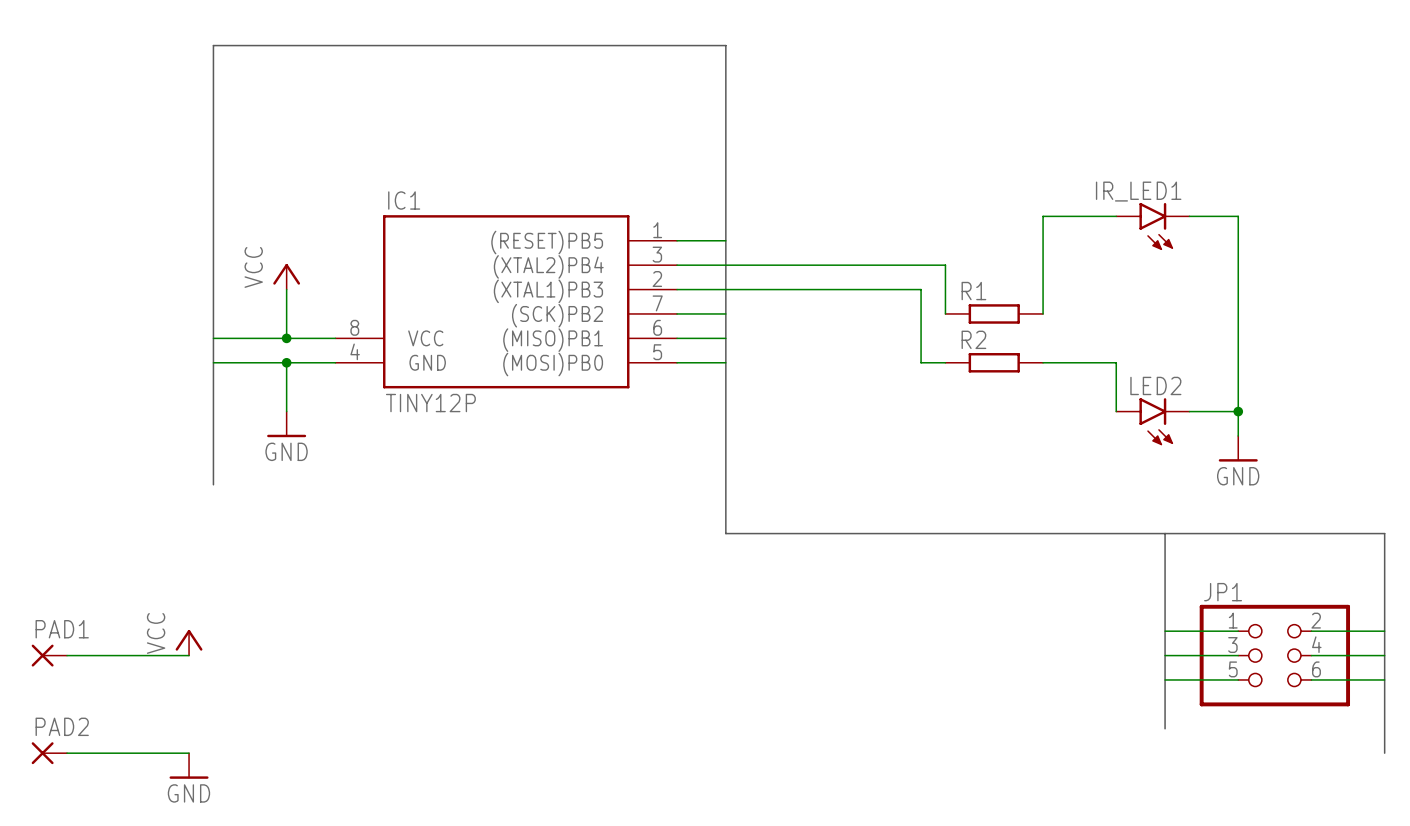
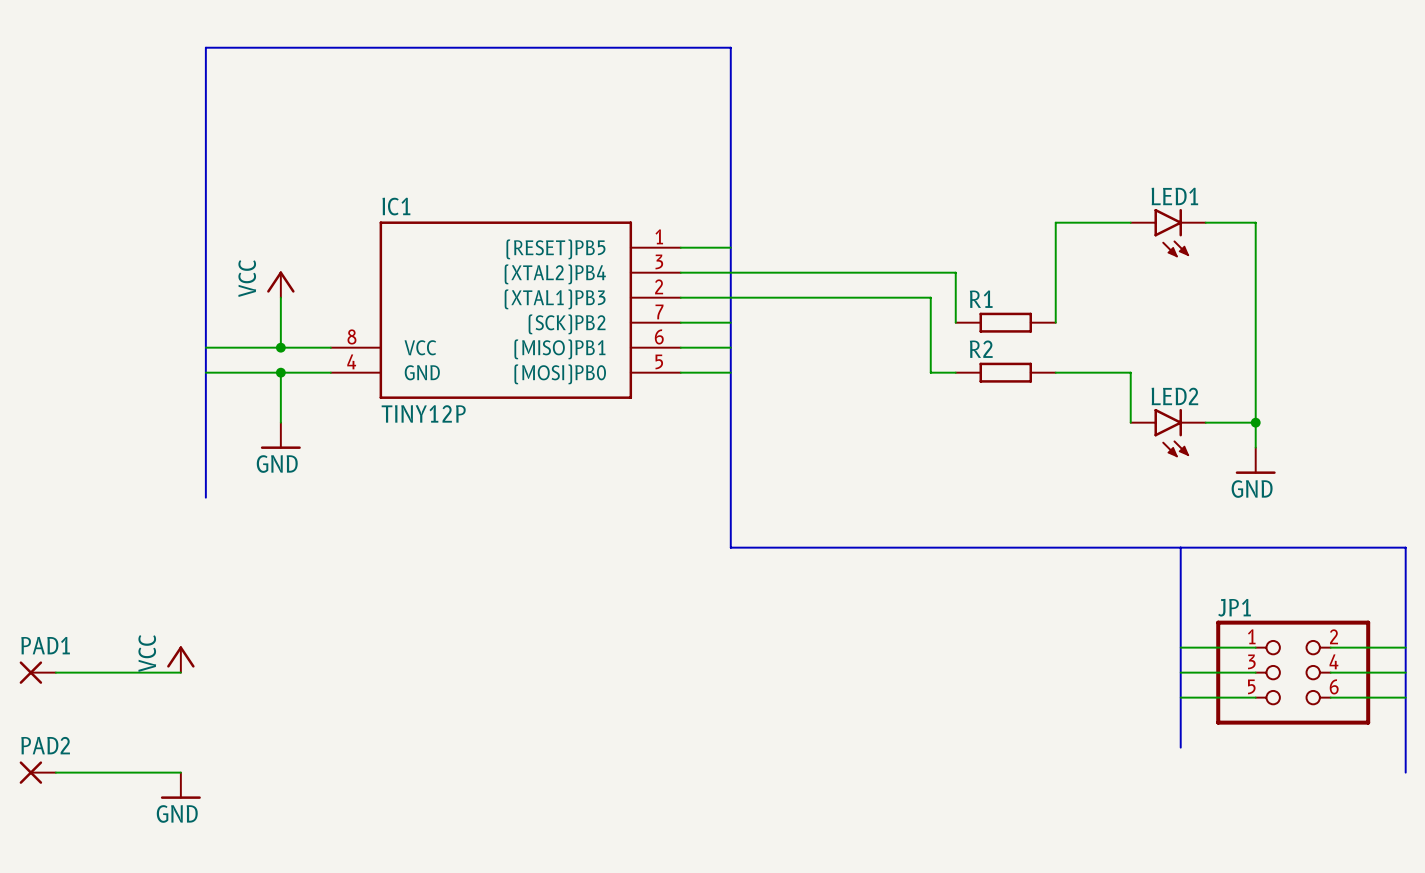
IR_LED1 name: IR_LED1 (1138, 191) -> LED1 (1174, 196)

